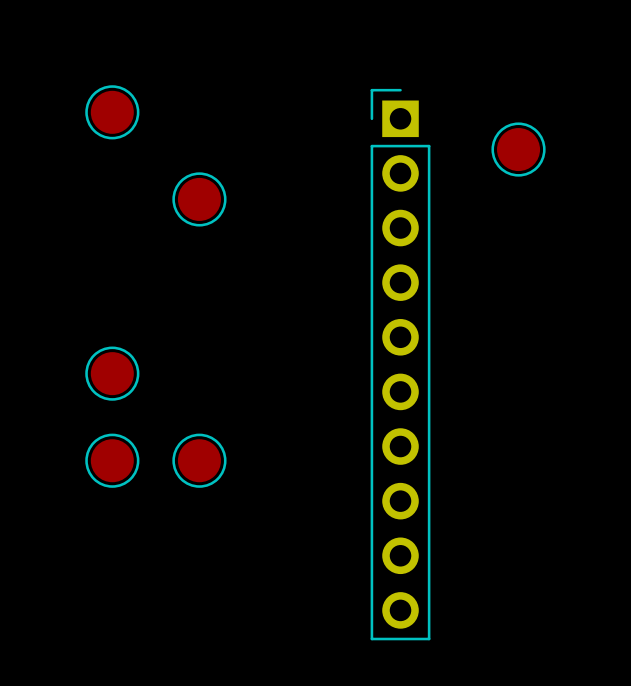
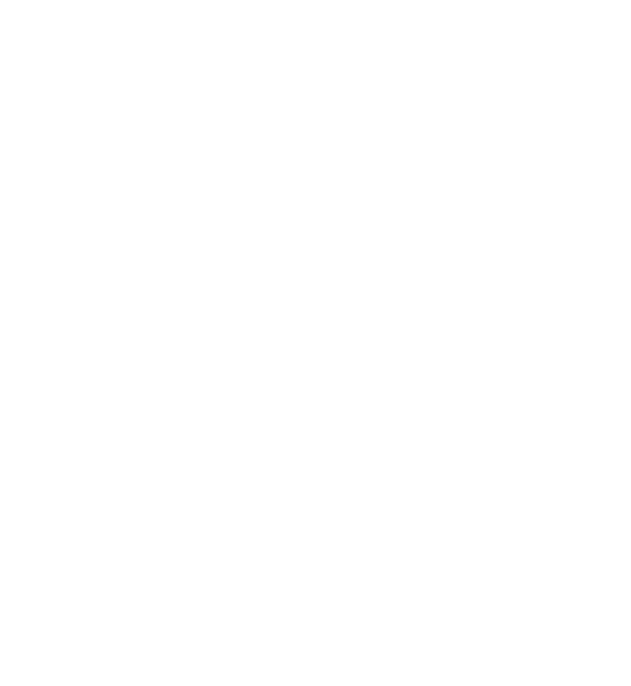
part: (112, 112) -> none
part: (518, 149) -> none
part: (199, 199) -> none
part: (400, 364) -> none
part: (112, 373) -> none
part: (112, 460) -> none
part: (199, 460) -> none

